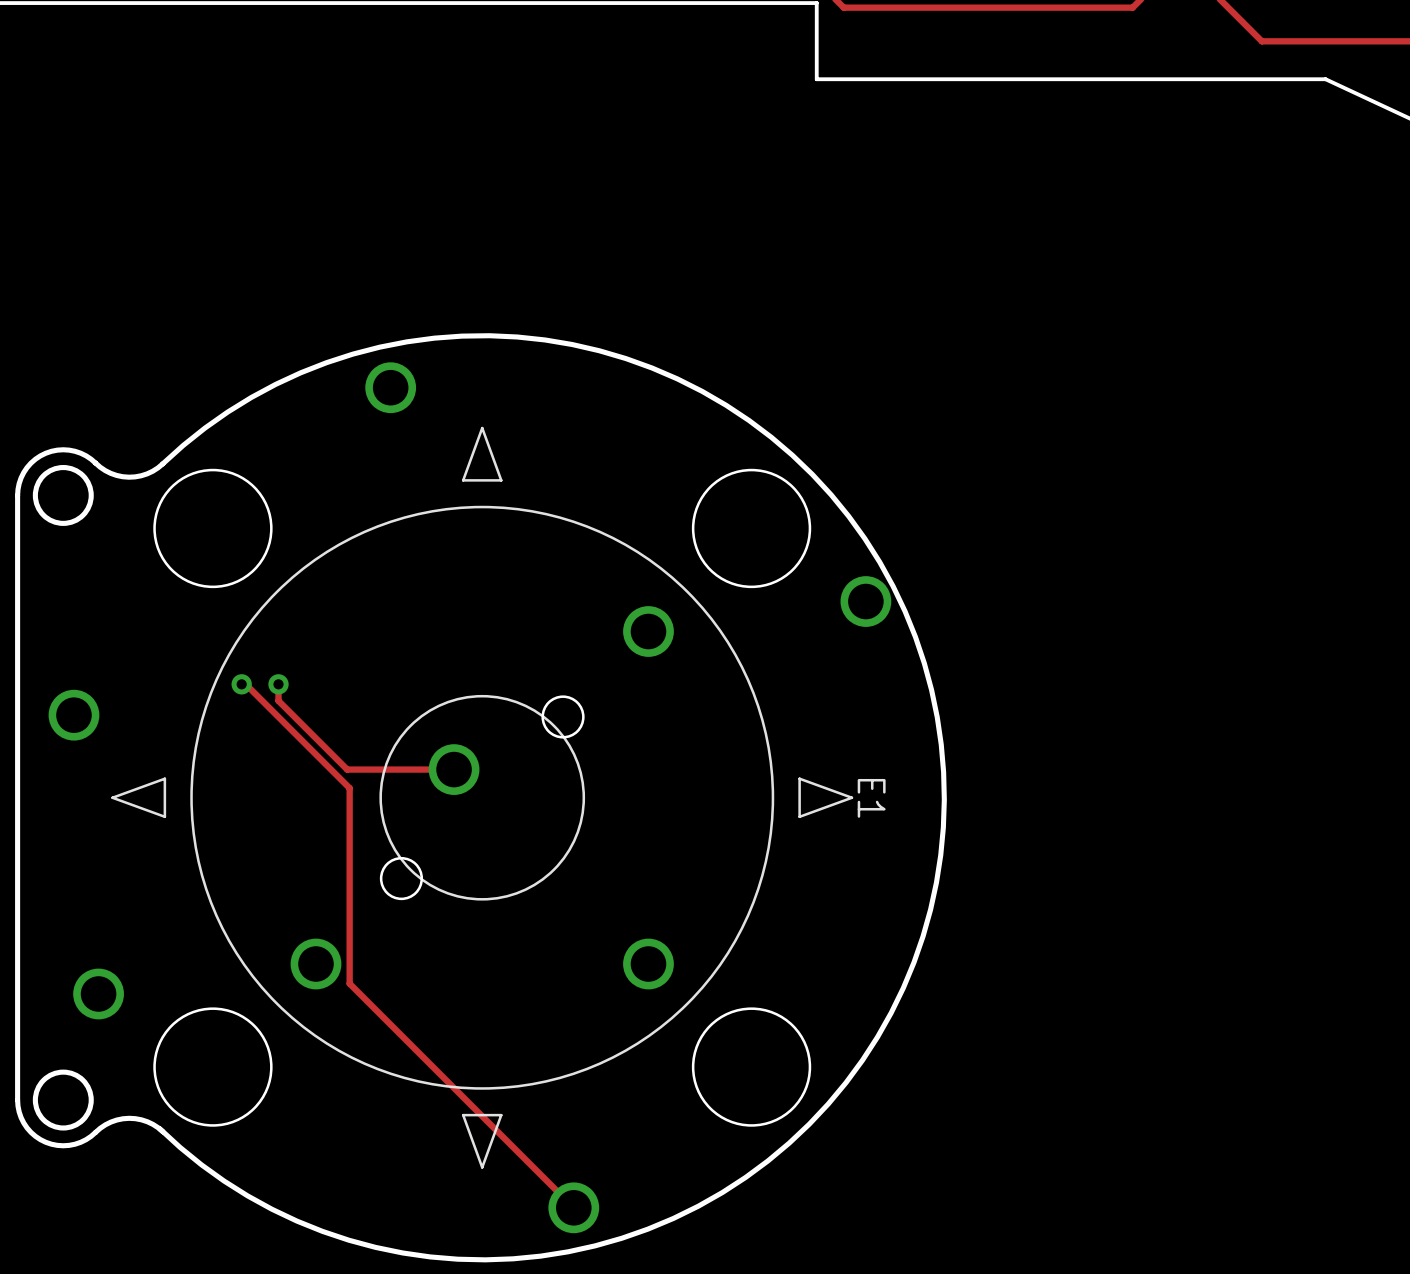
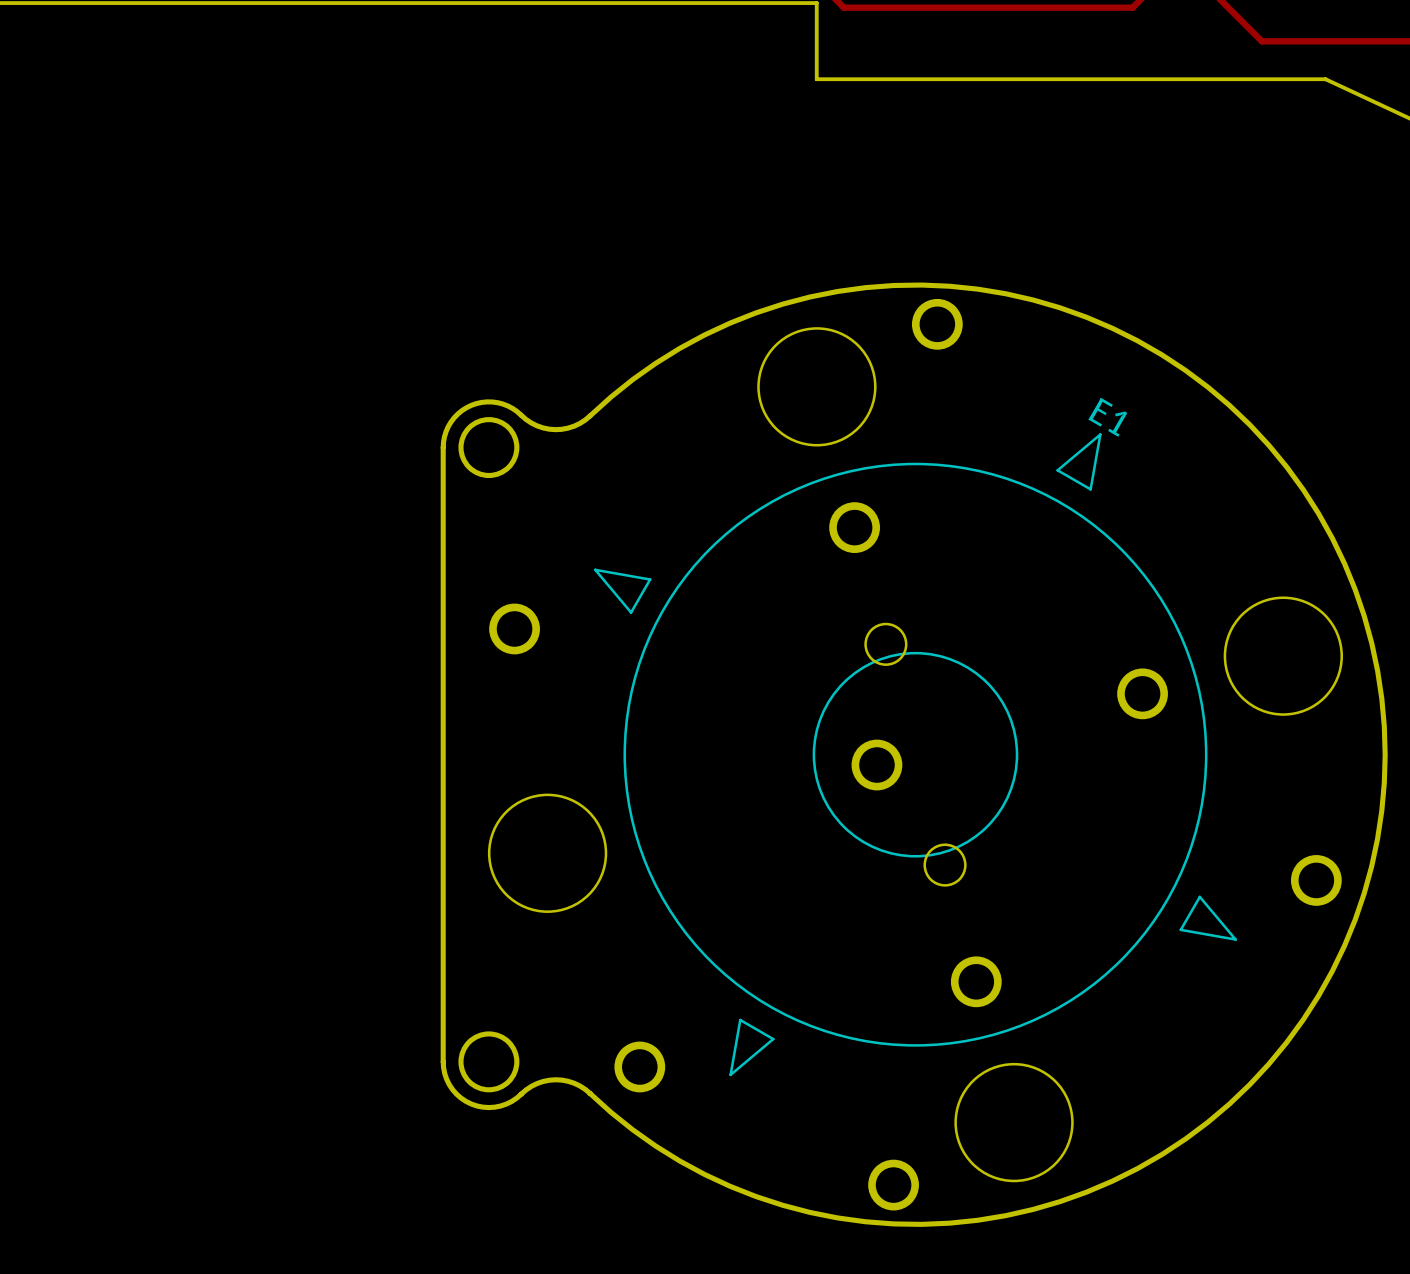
round board edge: none -> [458, 417, 520, 479]
board edge: (95, 462) (110, 473) (122, 476) (135, 476) (147, 473) (158, 467) (205, 428) (251, 397) (300, 372) (352, 354) (379, 347) (406, 341) (462, 336) (517, 337) (572, 344) (625, 358) (677, 378) (726, 405) (749, 420) (792, 455) (831, 494) (864, 538) (879, 562) (905, 611) (924, 663) (931, 690) (941, 744) (944, 799) (943, 827) (936, 882) (930, 909) (913, 962) (891, 1012) (877, 1037) (846, 1082) (809, 1124) (767, 1160) (722, 1192) (698, 1206) (647, 1229) (621, 1238) (568, 1251) (540, 1256) (485, 1259) (430, 1256) (402, 1252) (348, 1240) (296, 1221) (271, 1209) (224, 1181) (201, 1164) (159, 1128) -> none
board edge: (95, 463) (80, 453) (69, 450) (57, 450) (45, 453) (35, 459) (27, 467) (21, 477) (17, 489) (17, 1106) (23, 1122) (30, 1132) (40, 1139) (57, 1145) (69, 1145) (80, 1142) (105, 1124) (122, 1118) (135, 1118) (147, 1121) (162, 1131) -> none
round board edge: [32, 464, 94, 526] -> none
track: (241, 684) (245, 684) (349, 788) (349, 983) (573, 1207) -> none
via: (241, 684) -> none
track: (278, 684) (278, 700) (347, 769) (454, 769) -> none
via: (278, 684) -> none
E1 rotation: 0° (469, 797) -> 60° counterclockwise (915, 754)
round board edge: none -> [458, 1031, 520, 1093]
round board edge: [32, 1069, 94, 1131] -> none
board edge: none -> (590, 1093) (610, 1112) (655, 1146) (704, 1174) (730, 1186) (782, 1205) (837, 1217) (893, 1223) (921, 1224) (949, 1223) (1005, 1215) (1060, 1201) (1086, 1192) (1137, 1168) (1185, 1139) (1208, 1122) (1249, 1084) (1286, 1042) (1303, 1019) (1332, 971) (1355, 919) (1364, 893) (1377, 838) (1381, 810) (1385, 754) (1381, 698) (1371, 643) (1355, 589) (1344, 563) (1332, 538) (1303, 489) (1286, 467) (1249, 424) (1208, 387) (1185, 370) (1161, 354) (1112, 328) (1060, 307) (1033, 299) (977, 289) (921, 285) (893, 285) (837, 291) (782, 304) (730, 323) (679, 348) (655, 363) (610, 397) (585, 420) (568, 428) (555, 429) (542, 427) (531, 422) (508, 406) (492, 401) (471, 405) (457, 413) (446, 431) (443, 447) (443, 1067) (446, 1079) (456, 1094) (466, 1101) (482, 1107) (494, 1107) (506, 1104) (531, 1086) (549, 1080) (568, 1081) (579, 1086) (590, 1093)

